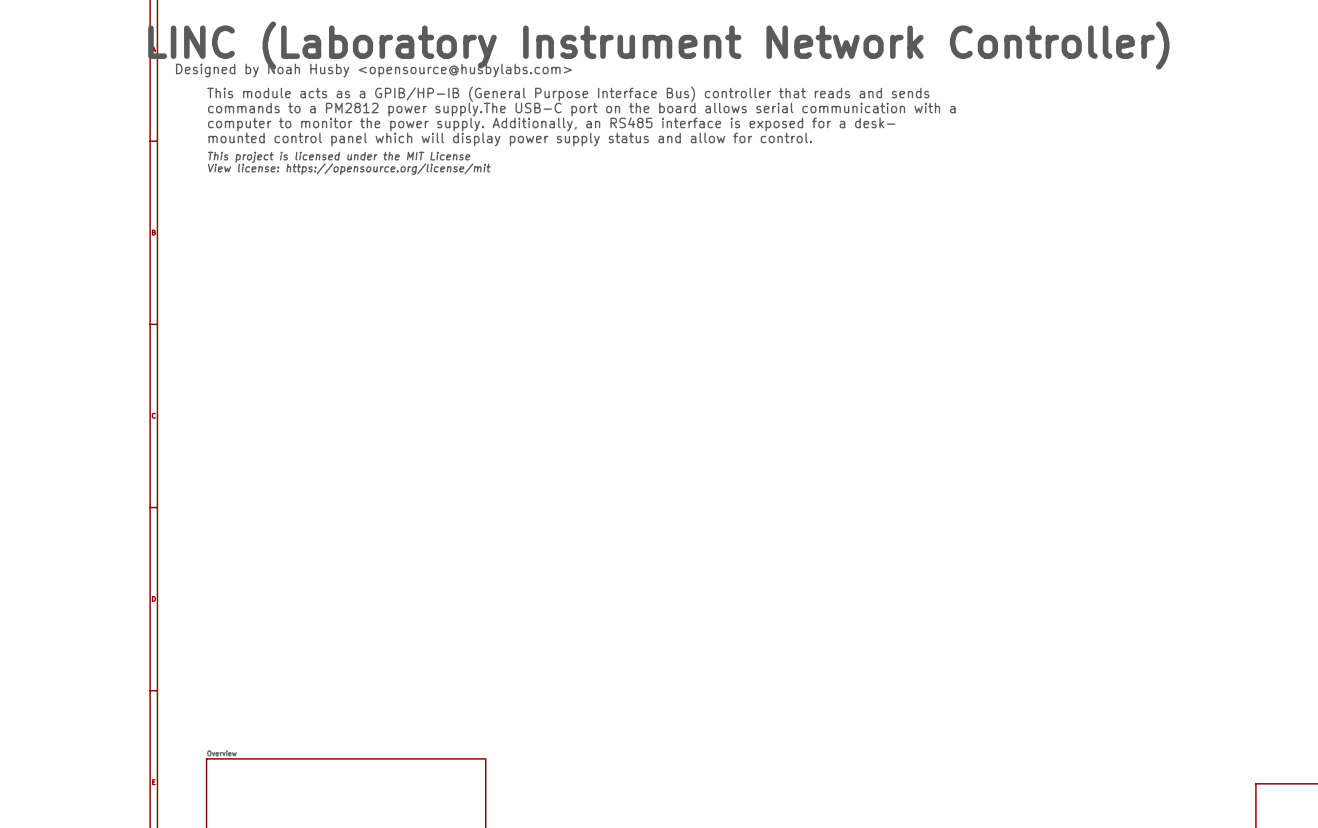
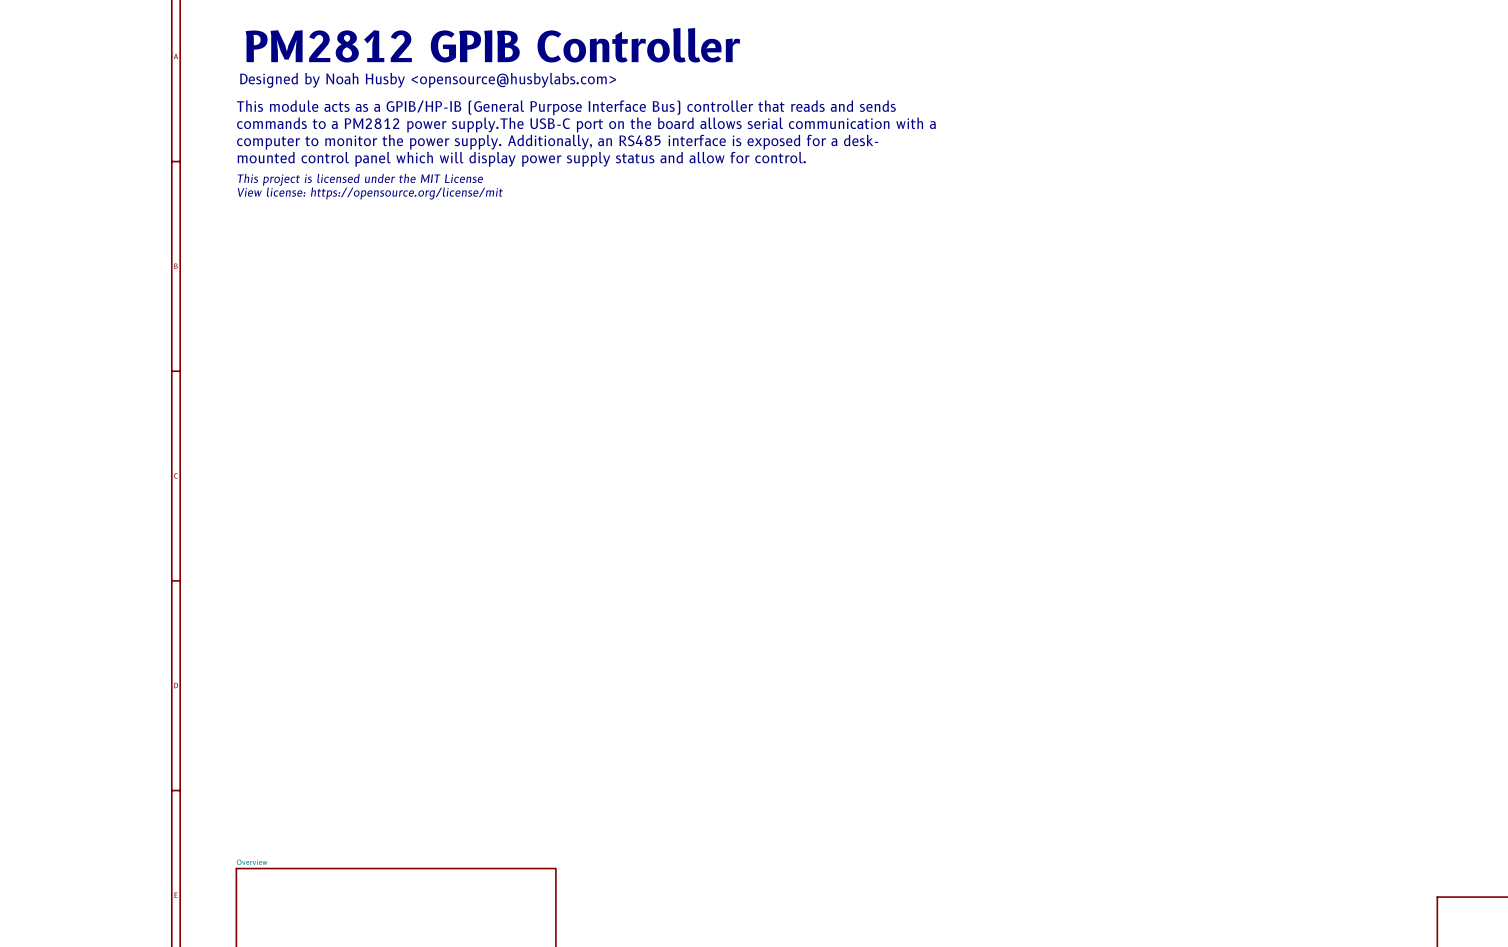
text: none -> PM2812 GPIB Controller (492, 45)
text: LINC (Laboratory Instrument Network Controller) (658, 45) -> none

